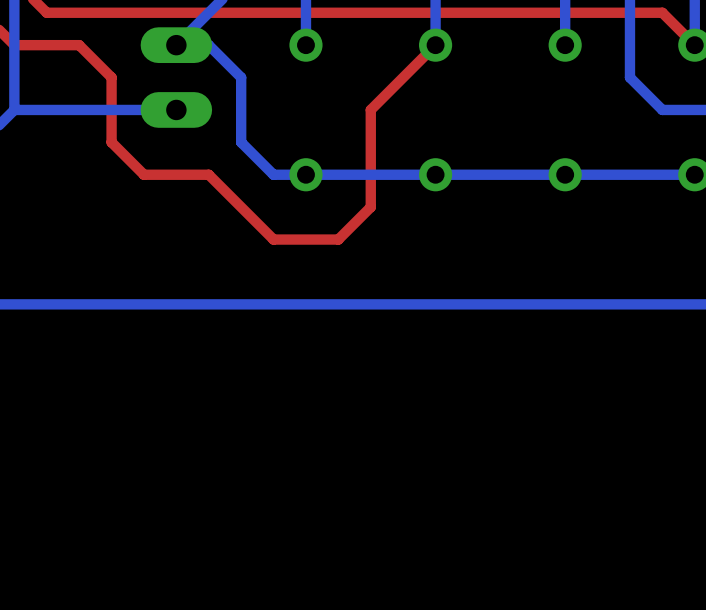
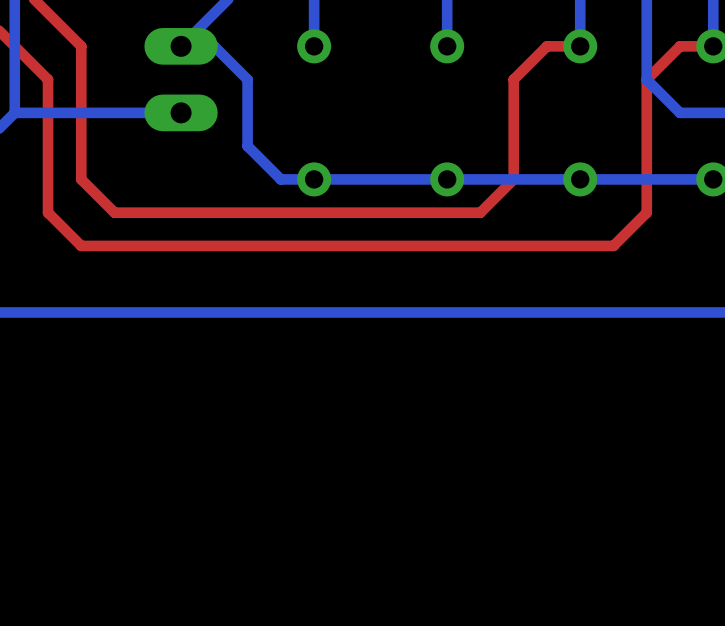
top track: (46, 12) (662, 12) (694, 45) -> (48, 13) (81, 46) (81, 179) (114, 212) (480, 212) (513, 179) (513, 79) (546, 46) (580, 46)
top track: (14, 45) (79, 45) (111, 77) (111, 142) (143, 174) (208, 174) (273, 239) -> (14, 46) (48, 79) (48, 212) (81, 245) (280, 245)
top track: (435, 45) (370, 109) (370, 207) (338, 239) -> (713, 46) (680, 46) (646, 79) (646, 212) (613, 245) (347, 245)

